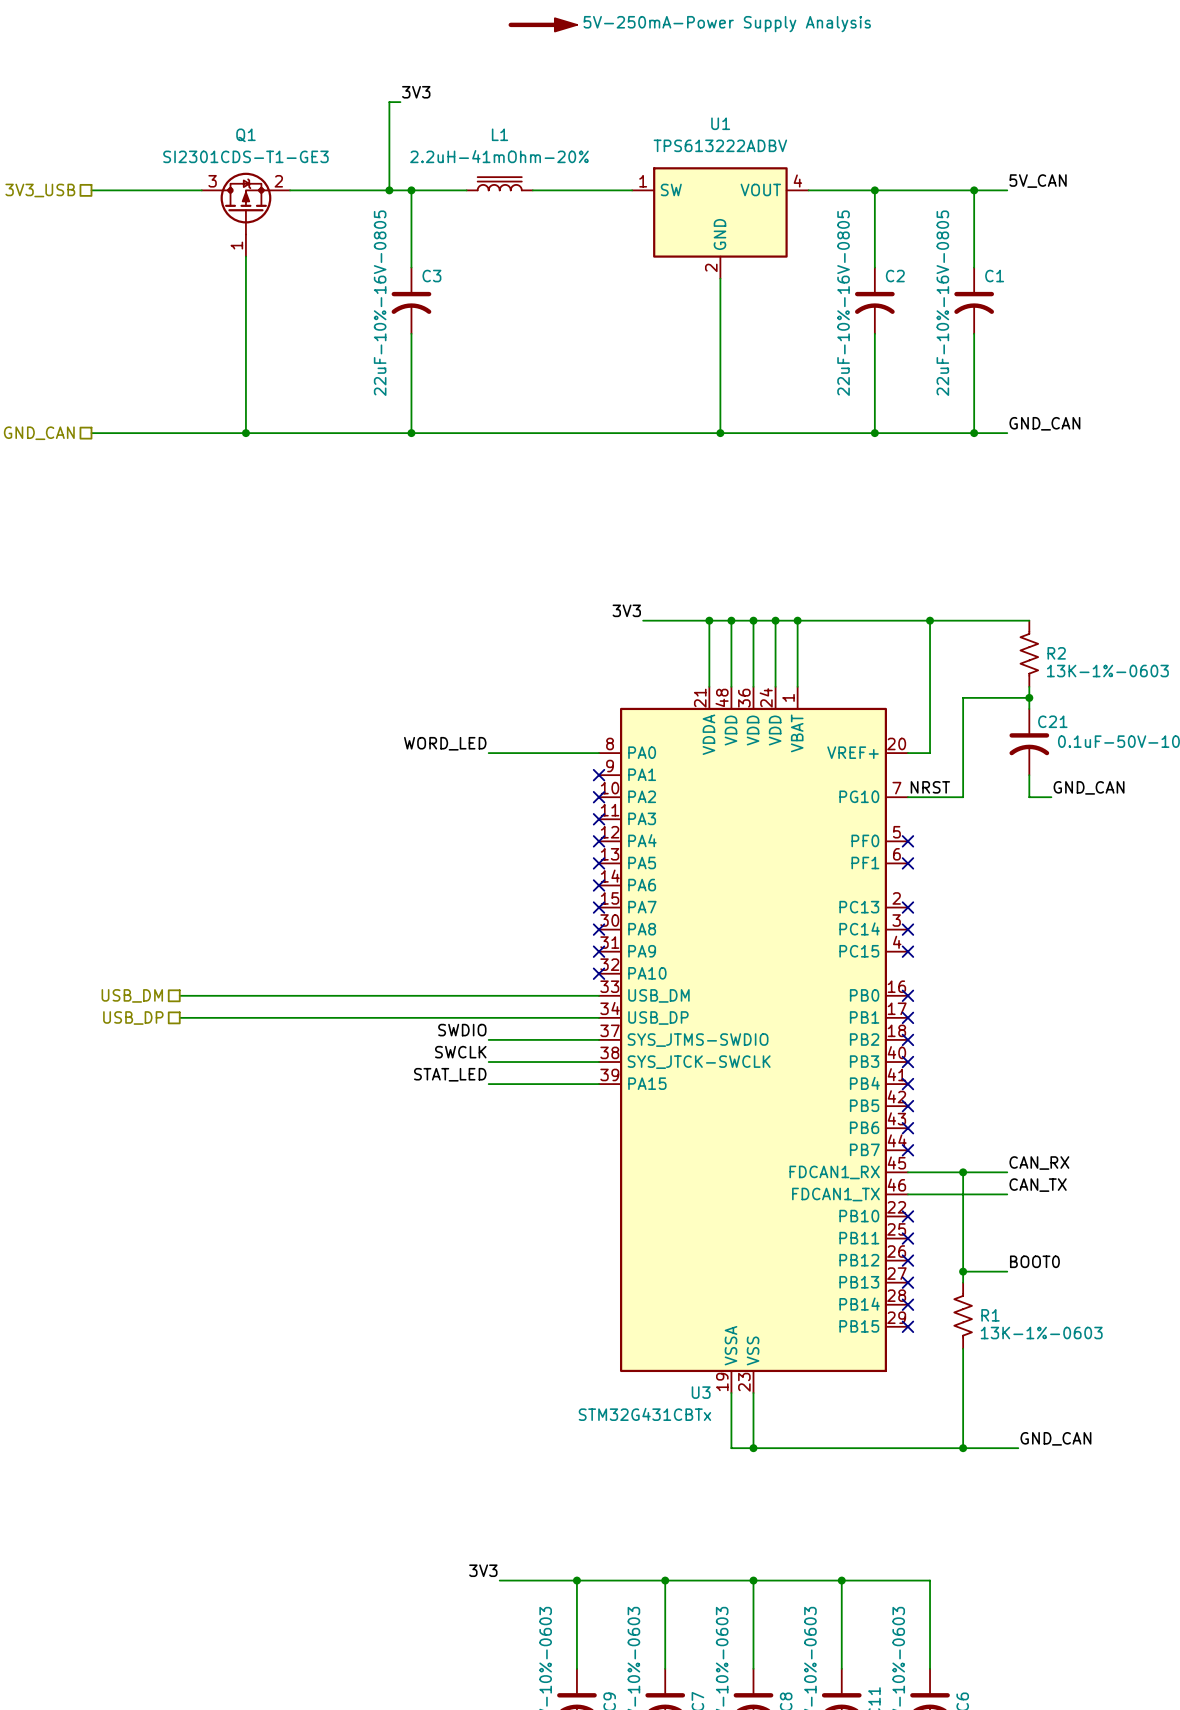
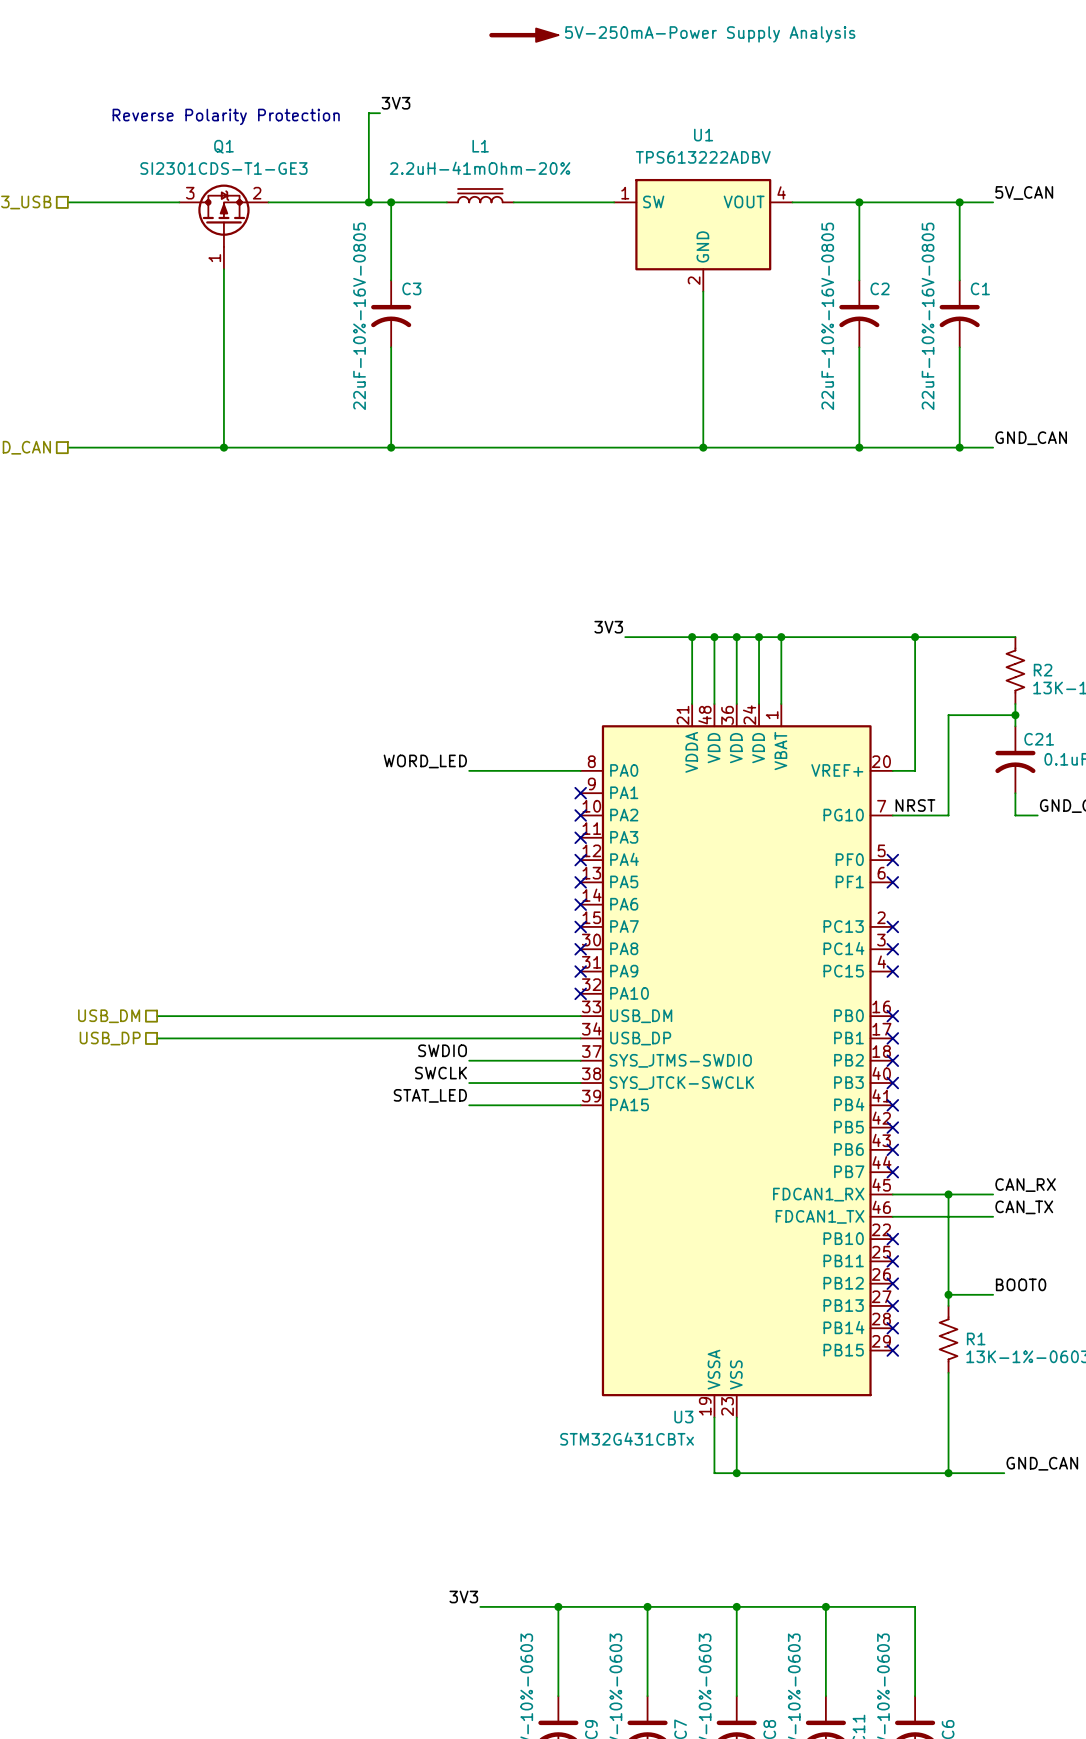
text: none -> Reverse Polarity Protection (226, 116)

